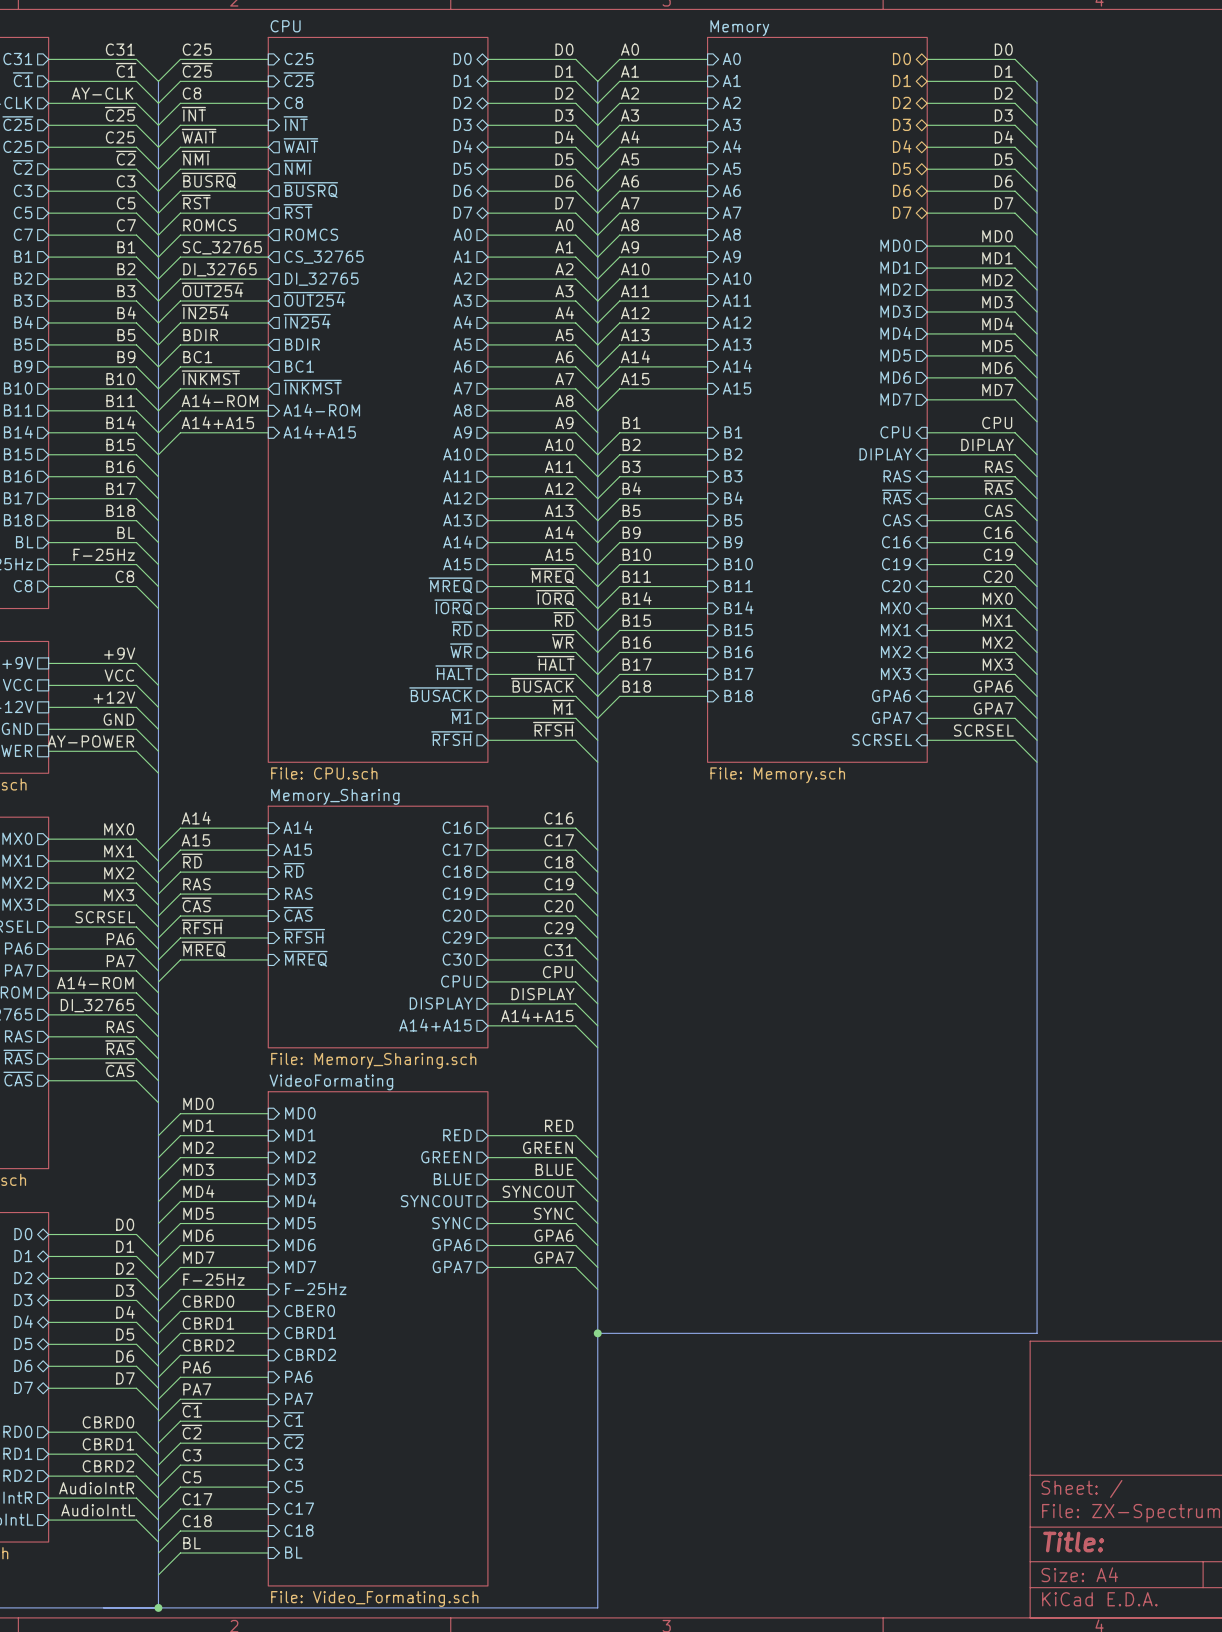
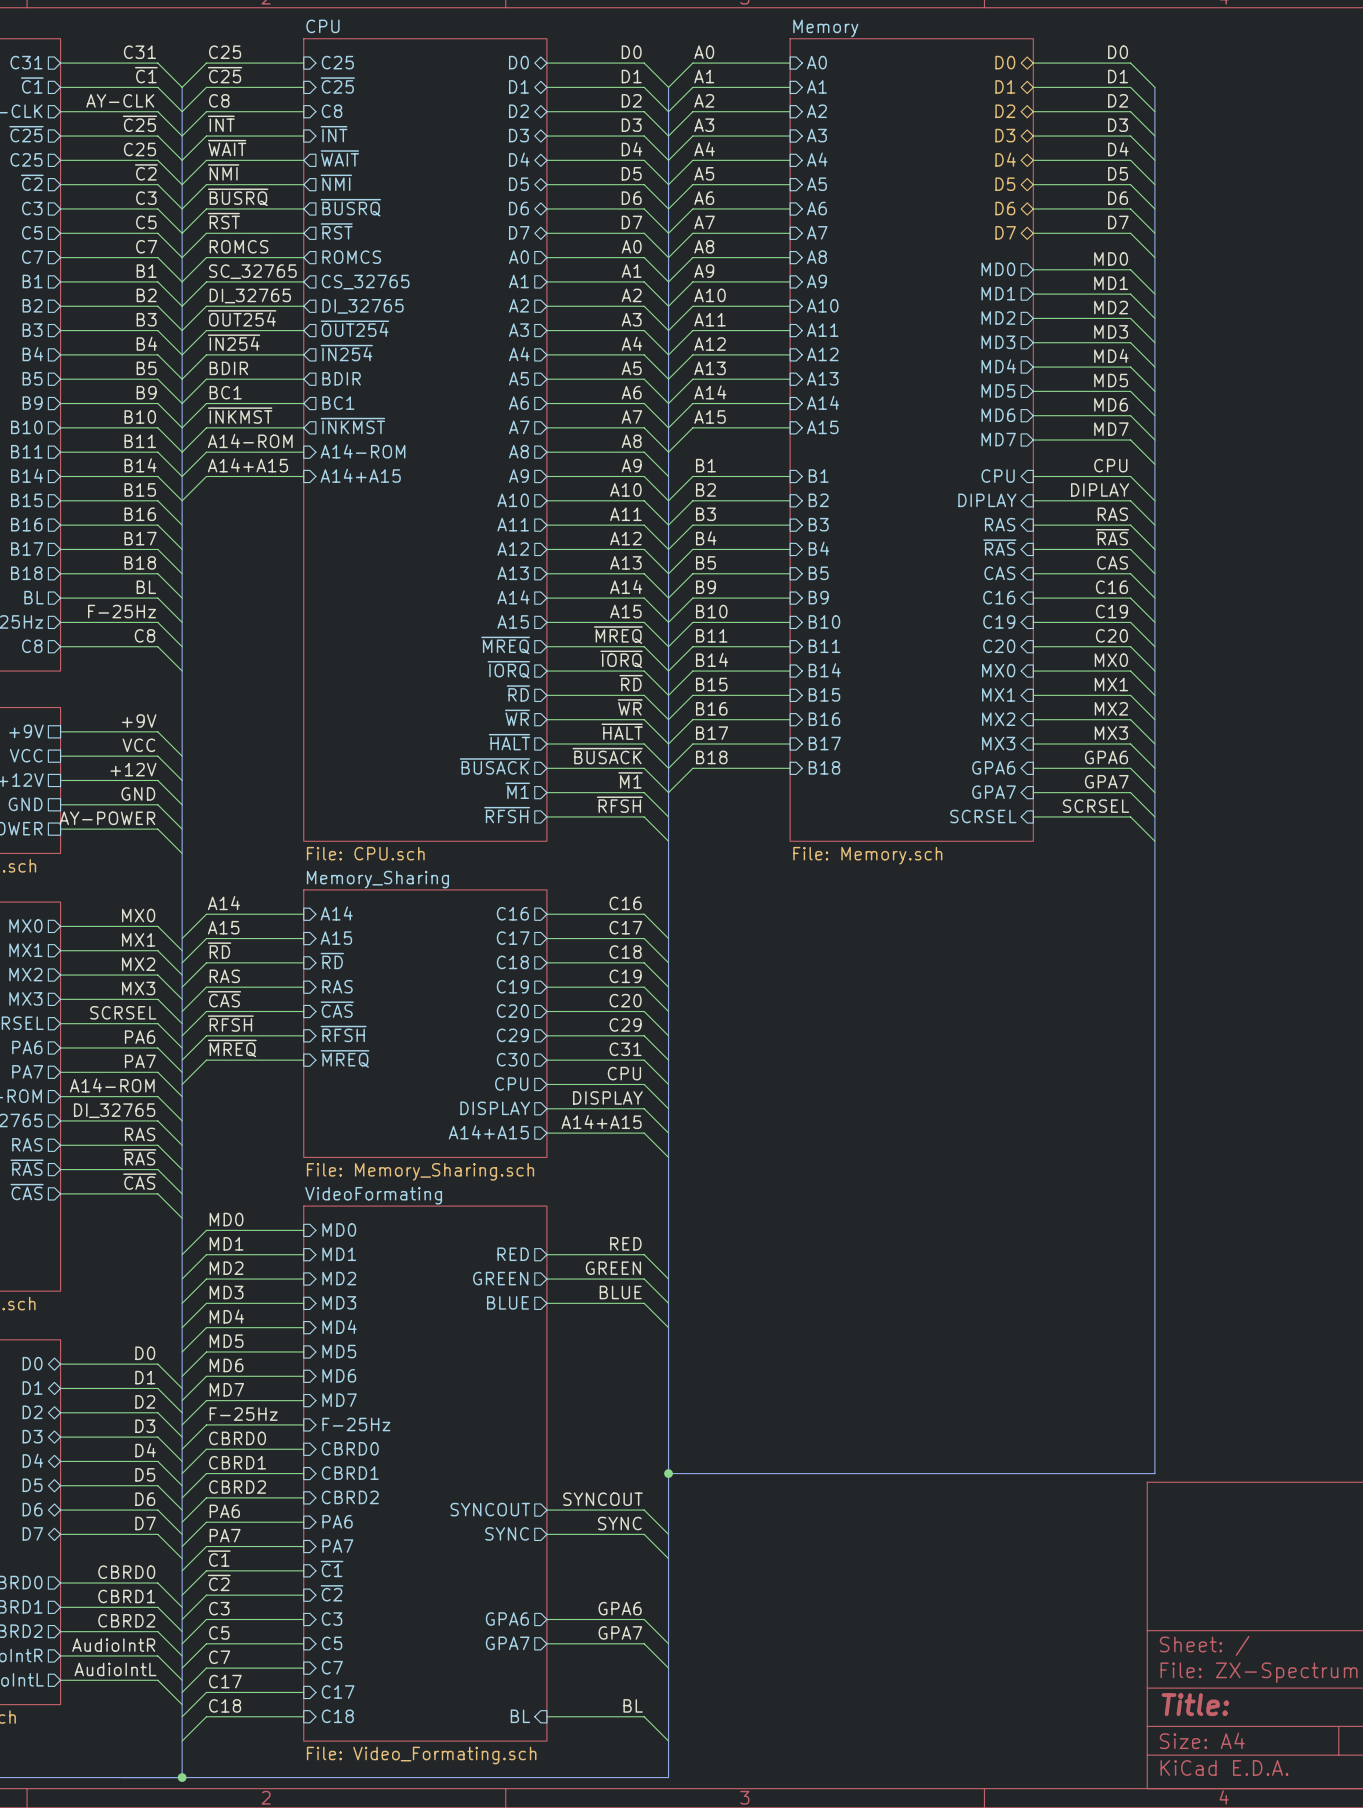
sheet VideoFormating shape: [268, 1091, 488, 1586] -> [303, 1206, 547, 1742]
label position: SYNCOUT (538, 1191) -> SYNCOUT (603, 1499)
sheet pin position: SYNCOUT (436, 1201) -> SYNCOUT (490, 1509)
wire: (487, 1201) (575, 1201) (597, 1223) -> none
label position: SYNC (553, 1213) -> SYNC (619, 1523)
sheet pin position: SYNC (451, 1223) -> SYNC (507, 1533)
wire: (487, 1223) (575, 1223) (597, 1245) -> none
label: GPA6 (554, 1235) -> none
sheet pin: GPA6 (452, 1245) -> none
wire: (487, 1245) (575, 1245) (597, 1267) -> (546, 1510) (644, 1510) (668, 1534)
label: GPA7 (554, 1257) -> none
sheet pin: GPA7 (452, 1267) -> none
wire: (487, 1267) (575, 1267) (597, 1289) -> (546, 1534) (644, 1534) (668, 1558)
sheet pin: CBER0 (309, 1310) -> CBRD0 (350, 1448)
label: none -> GPA6 (620, 1608)
sheet pin: none -> GPA6 (507, 1619)
wire: none -> (546, 1619) (644, 1619) (668, 1643)
label: none -> GPA7 (620, 1632)
sheet pin: none -> GPA7 (507, 1643)
wire: none -> (546, 1643) (644, 1643) (668, 1668)
label: C17 (197, 1499) -> C7 (219, 1657)
sheet pin: C17 (299, 1508) -> C7 (332, 1667)
label: C18 (197, 1521) -> C17 (225, 1681)
sheet pin: C18 (299, 1530) -> C17 (338, 1691)
label: BL (192, 1543) -> C18 (225, 1705)
label: none -> BL (633, 1705)
sheet pin: BL (293, 1552) -> C18 (337, 1716)
sheet pin: none -> BL (520, 1716)
wire: none -> (546, 1716) (644, 1716) (668, 1741)

